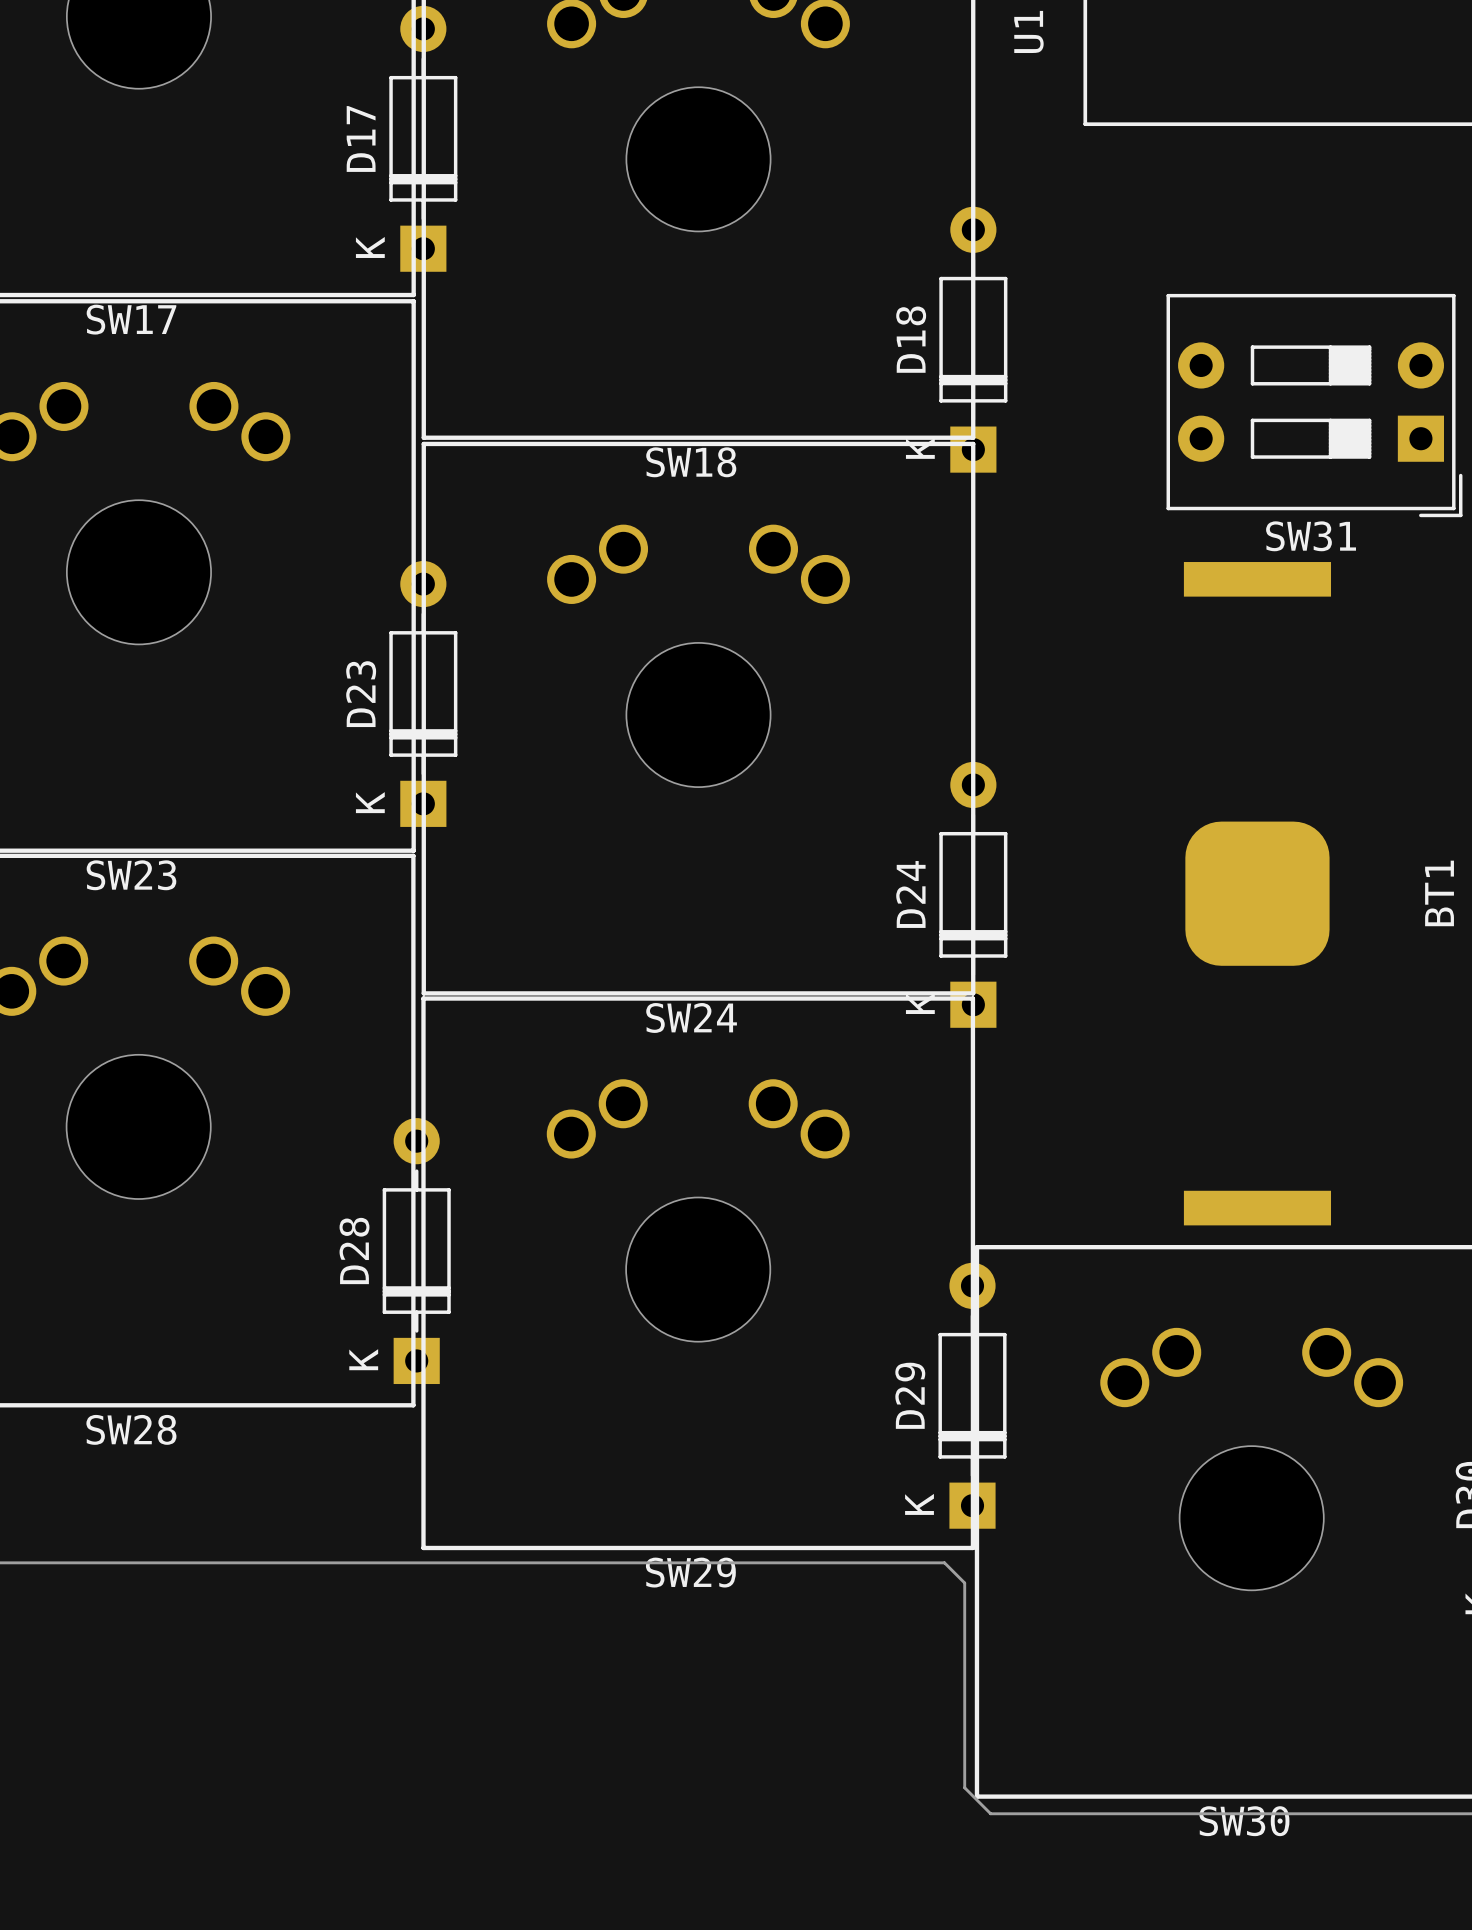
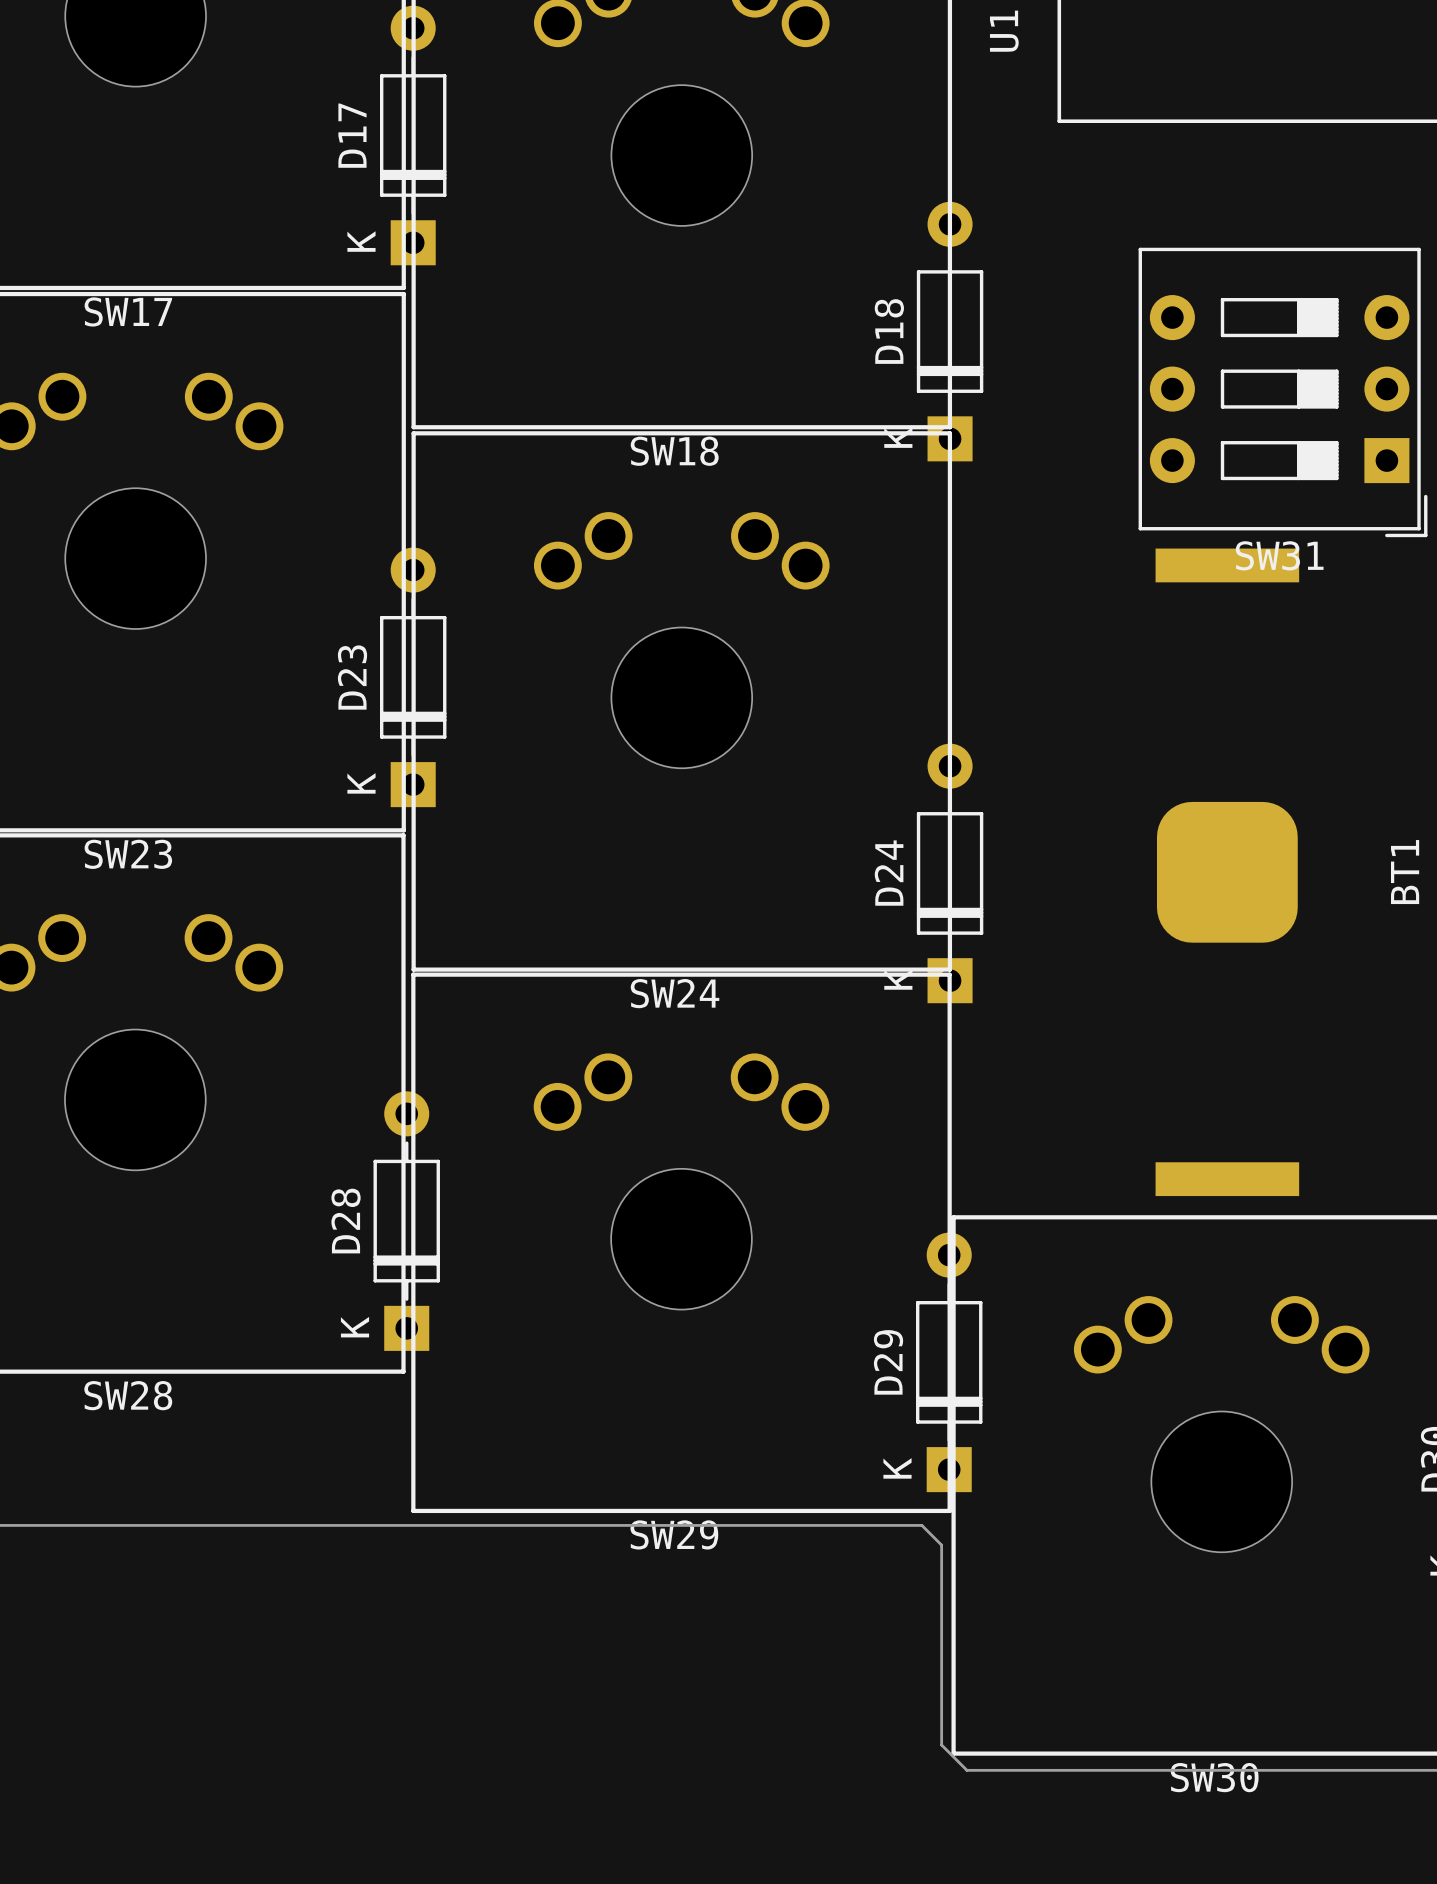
SW31 footprint: [1166, 293, 1463, 518] -> [1138, 247, 1428, 538]

